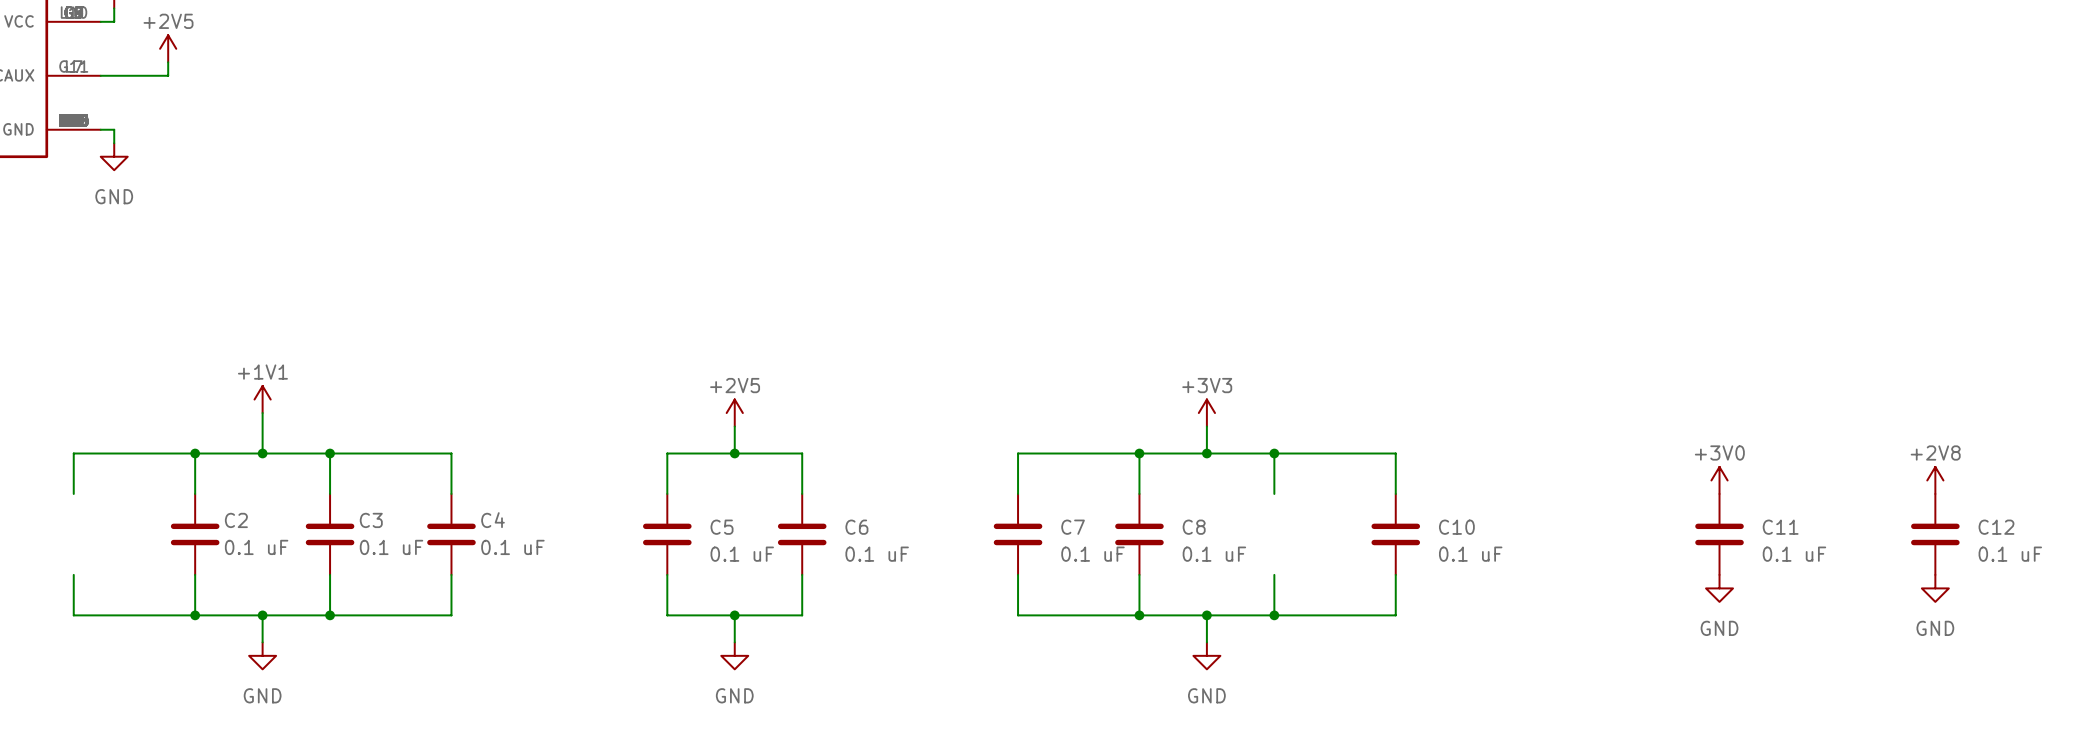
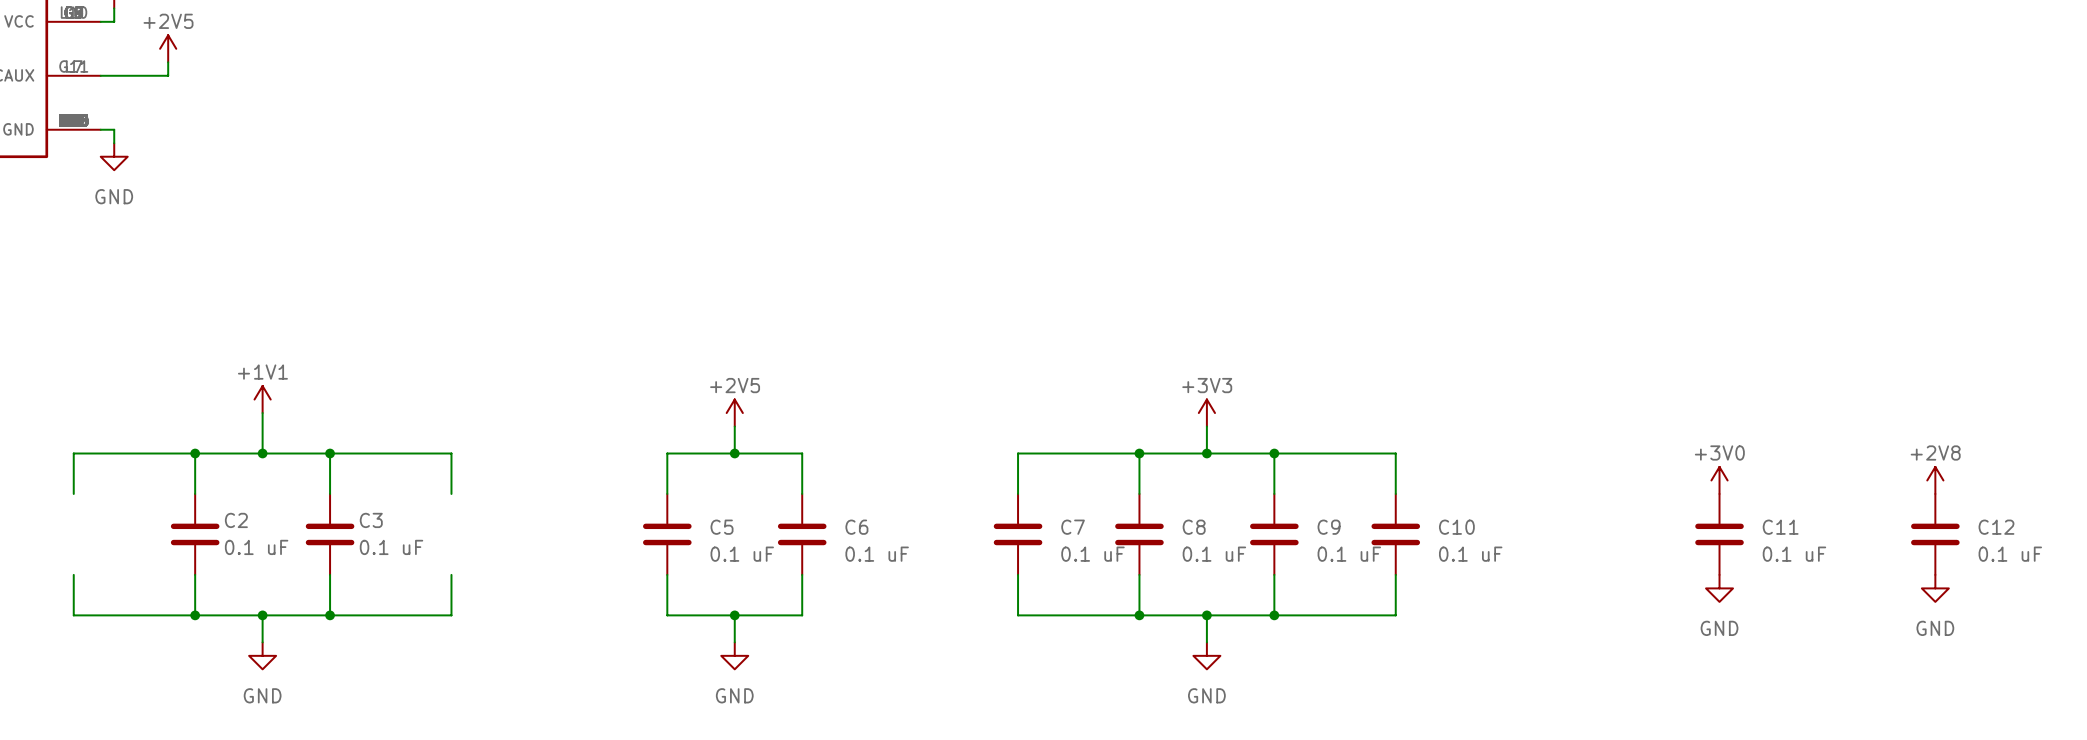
C4: 0.1 uF (451, 534) -> none
C9: none -> 0.1 uF (1274, 534)

